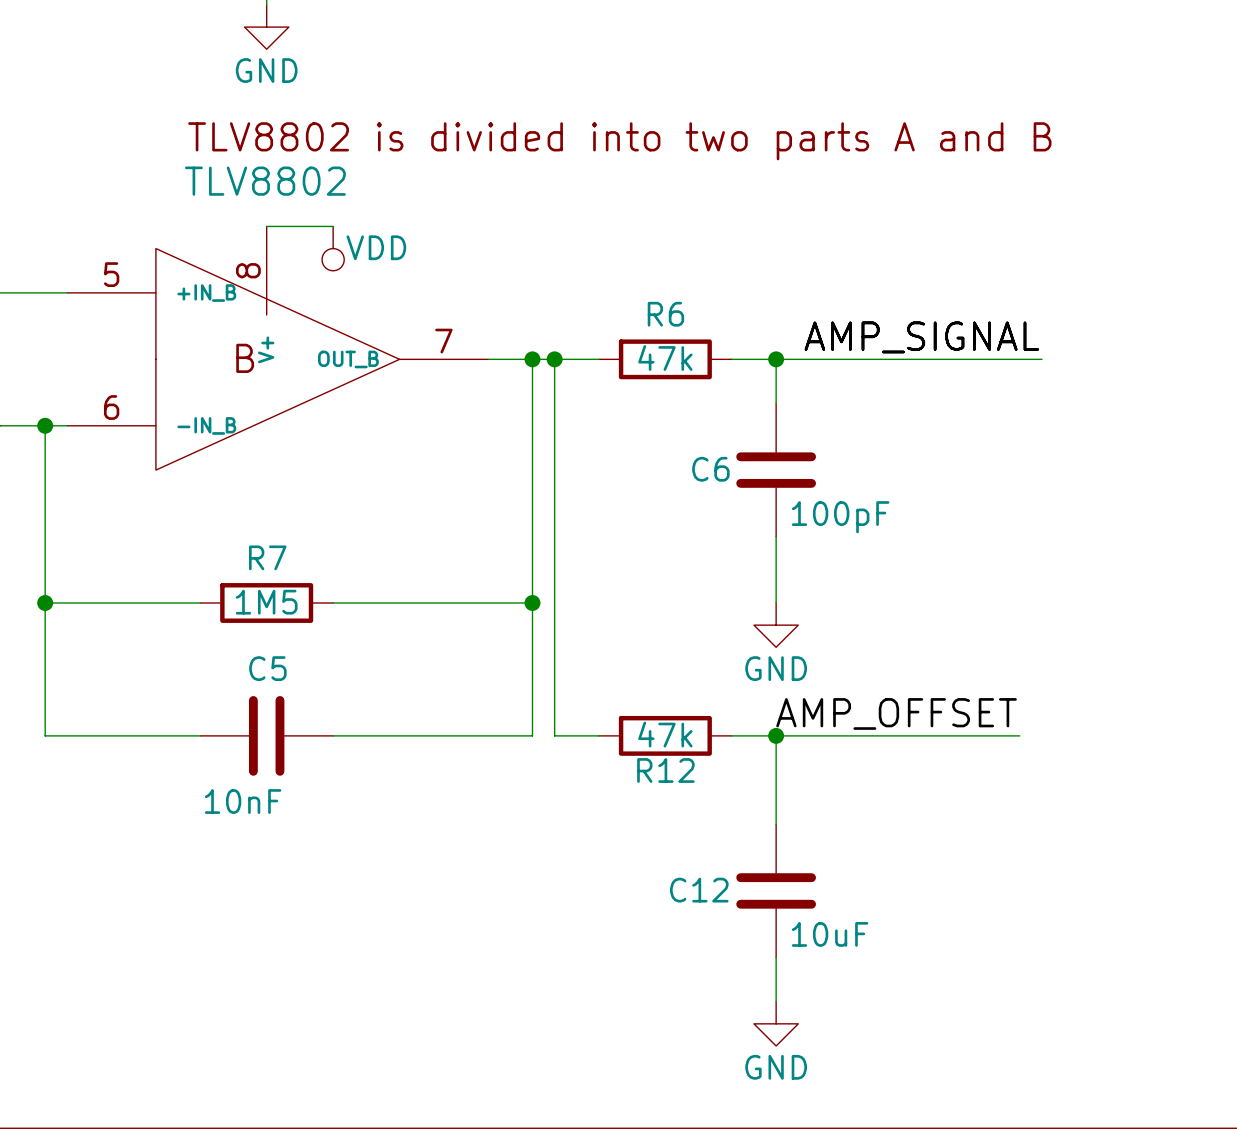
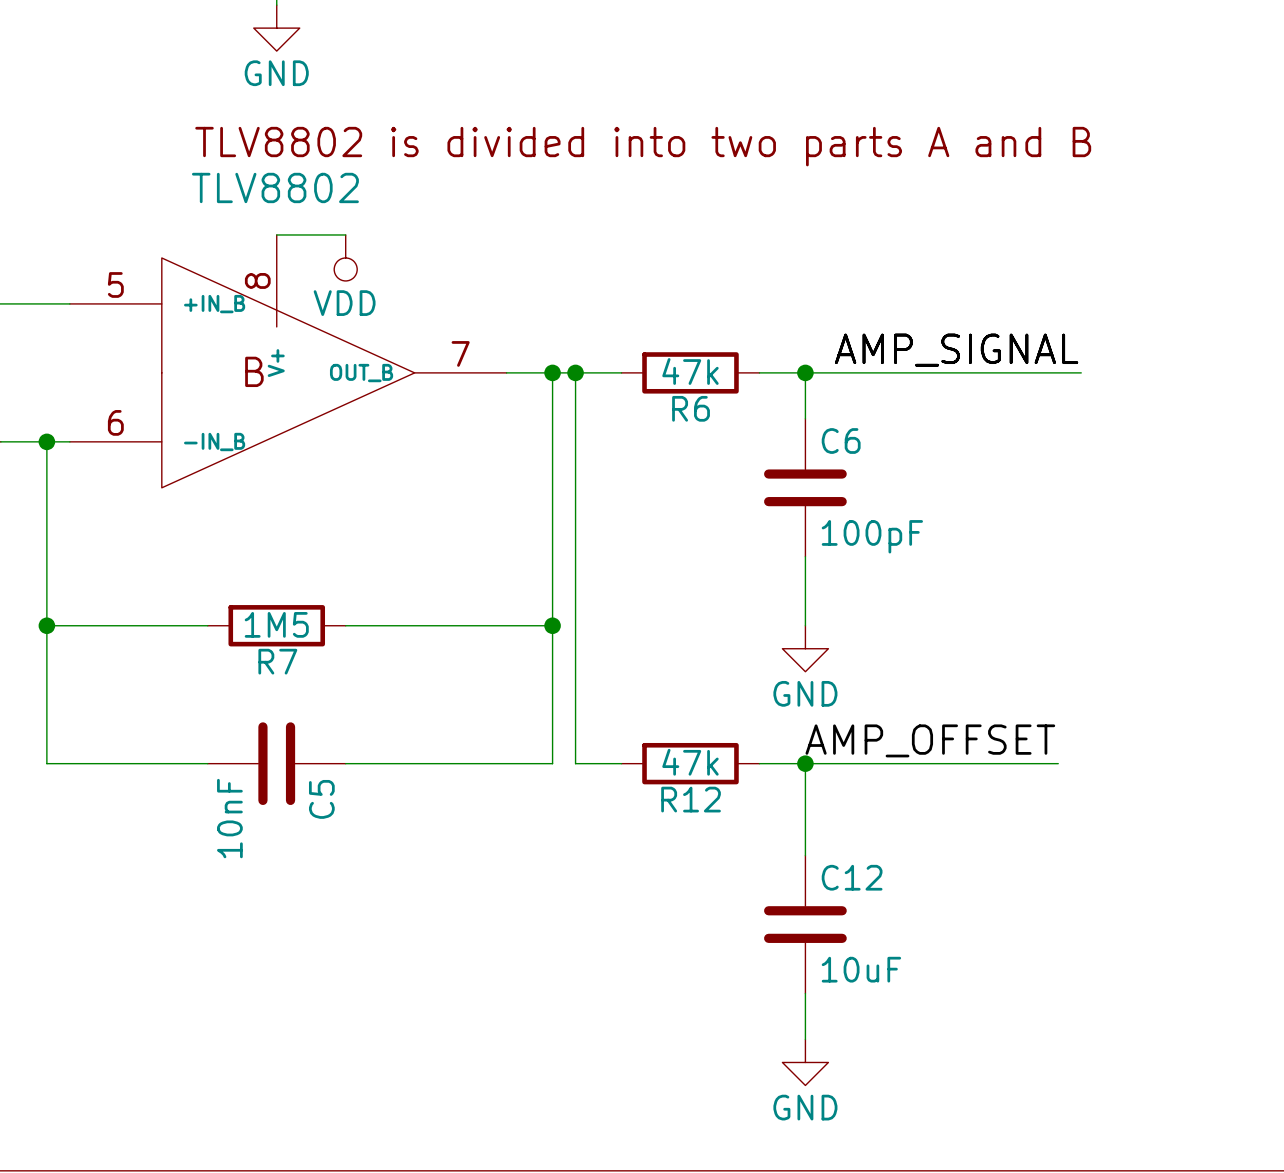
power symbol text position: VDD (376, 247) -> VDD (344, 303)
R6 name position: R6 (665, 314) -> R6 (691, 408)
C6 name position: C6 (710, 469) -> C6 (841, 441)
R7 name position: R7 (267, 557) -> R7 (277, 661)
C5 name rotation: 0° (267, 668) -> 90° counterclockwise (321, 799)
C5 name position: C5 (267, 668) -> C5 (321, 799)
C5 value rotation: 0° (243, 801) -> 90° counterclockwise (229, 818)
C12 name position: C12 (699, 890) -> C12 (852, 877)

